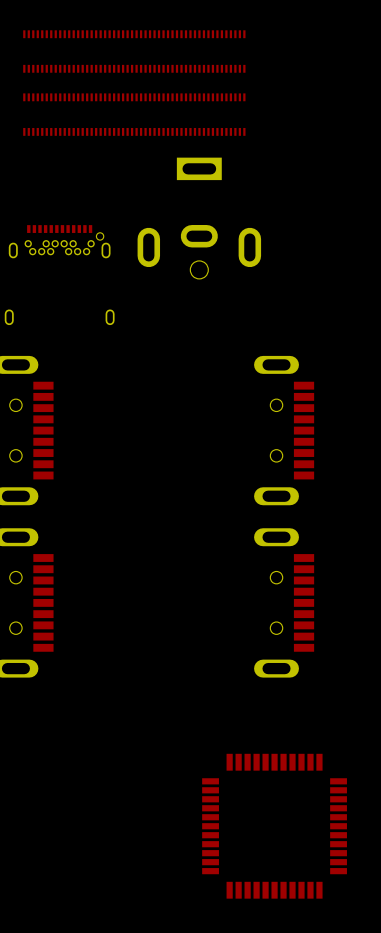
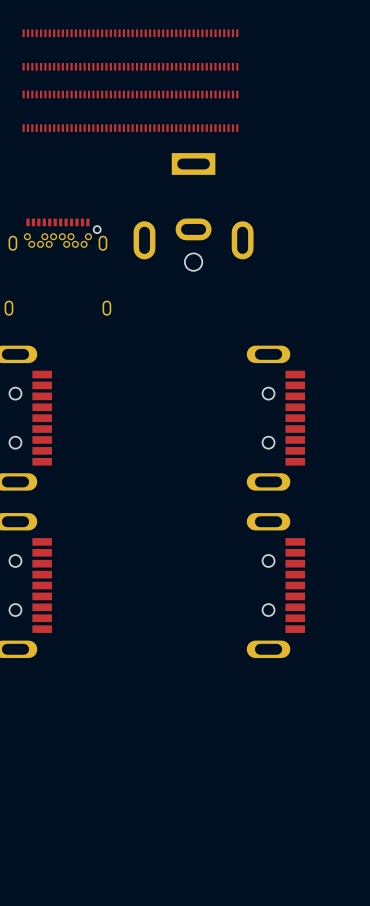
part: (274, 826) -> none

